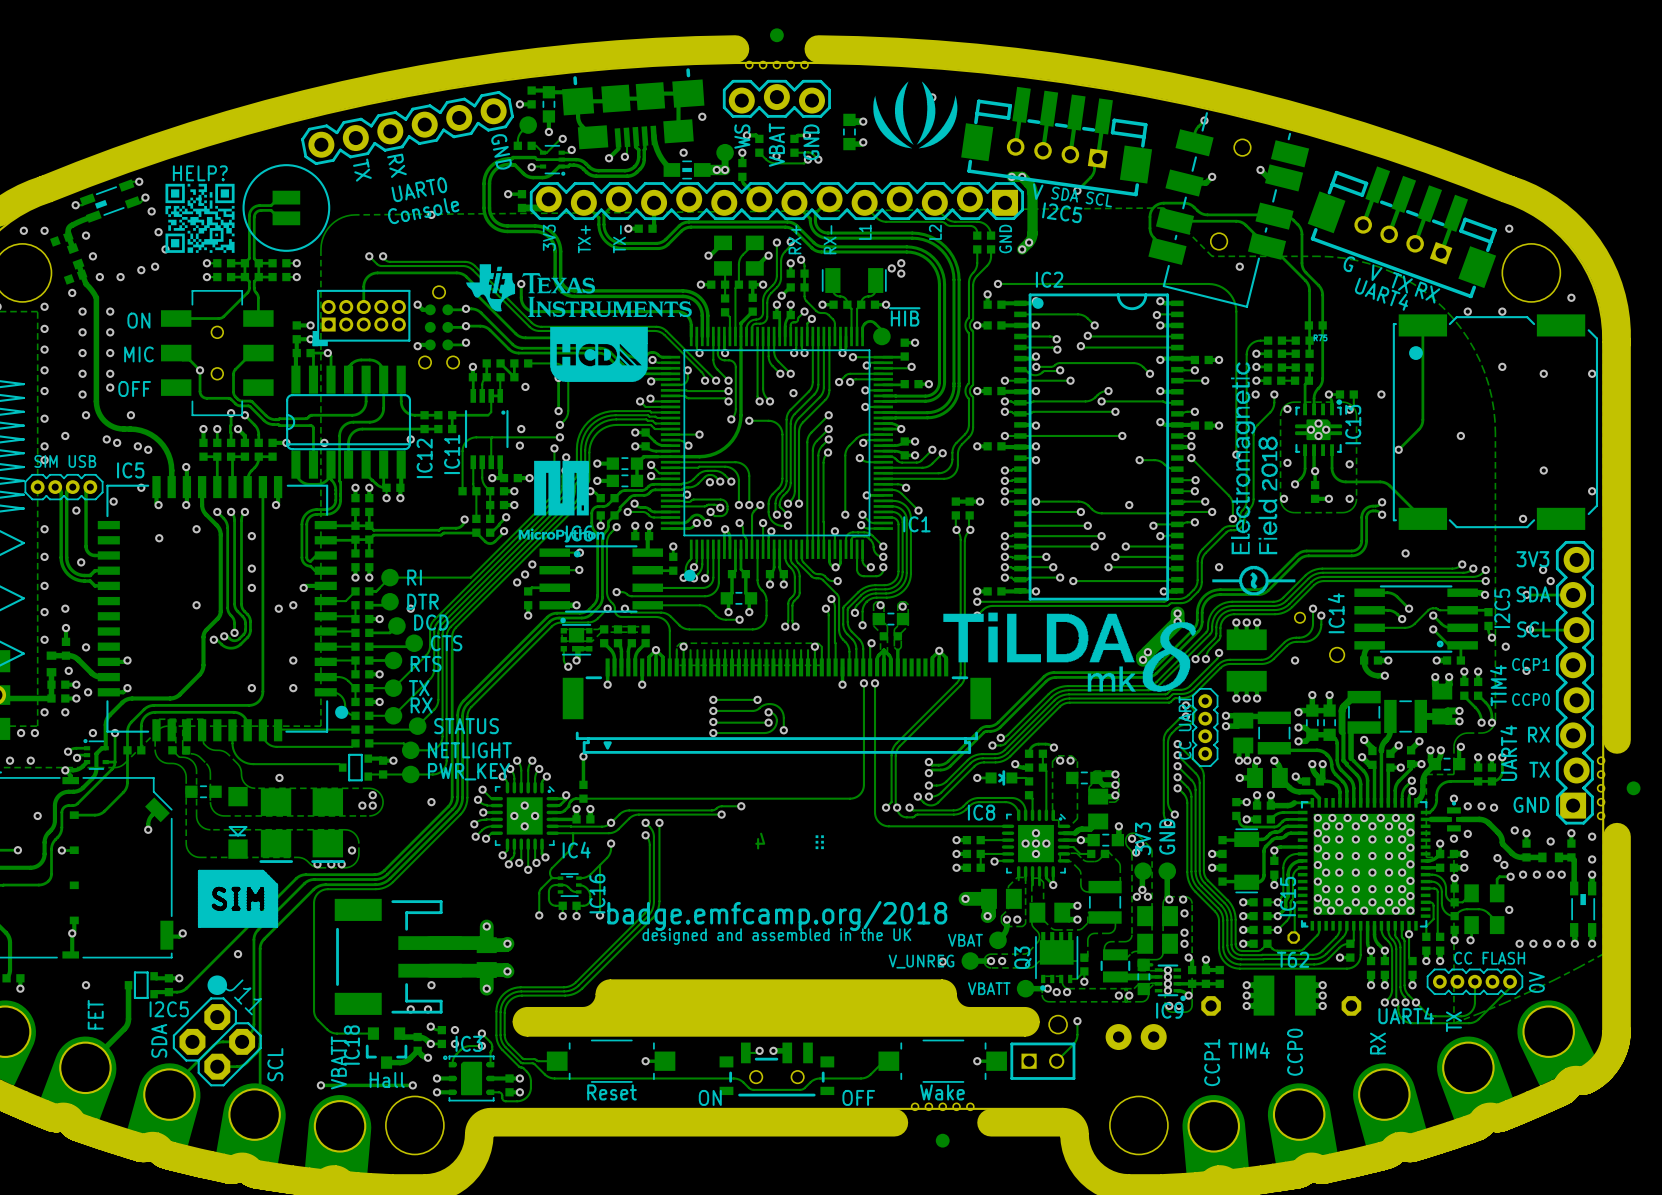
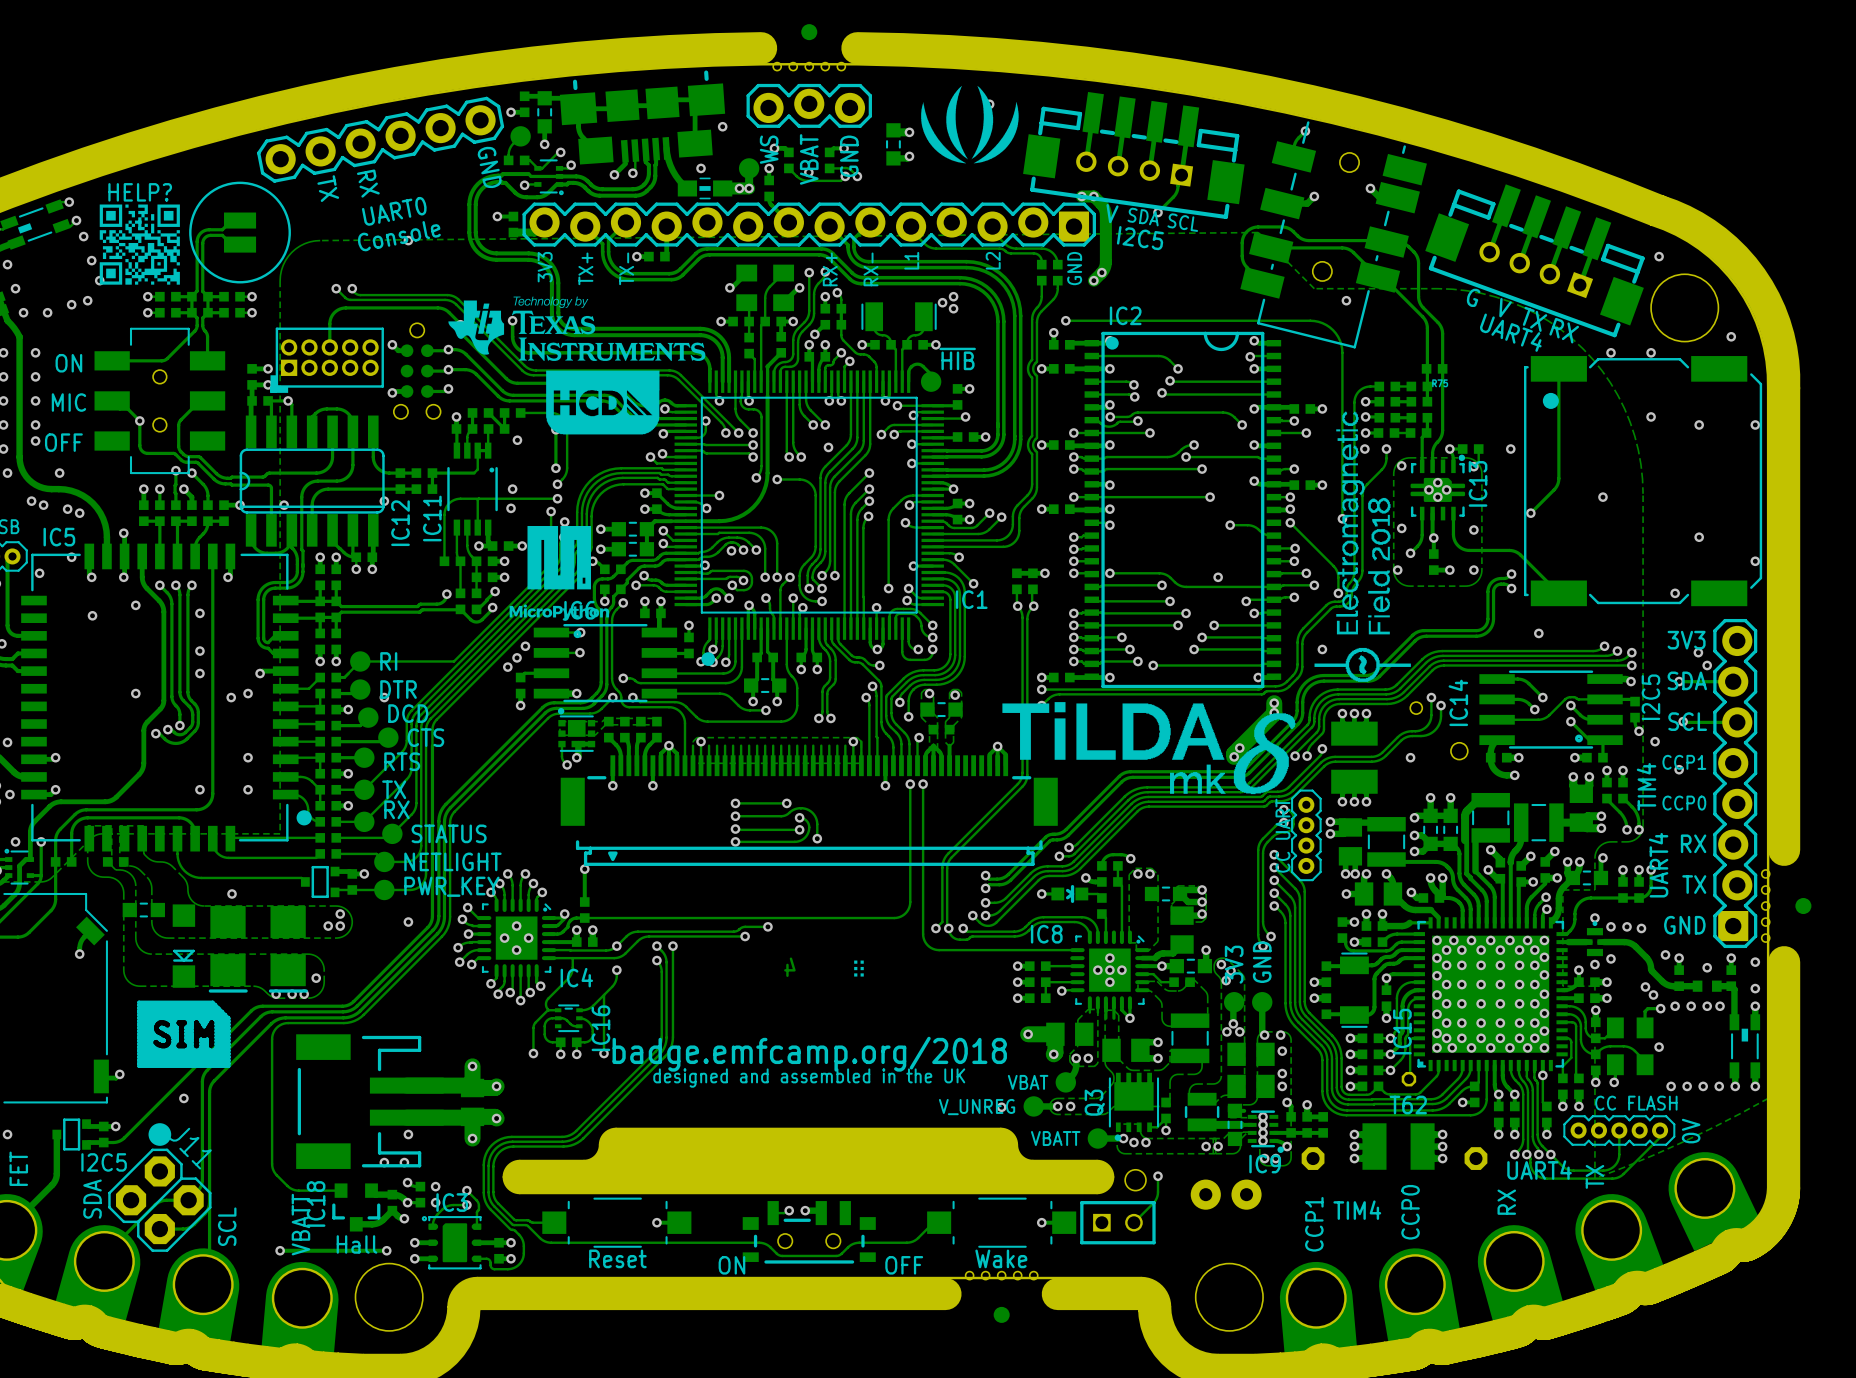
drawing shape: [466, 264, 692, 318] -> [448, 296, 706, 361]

